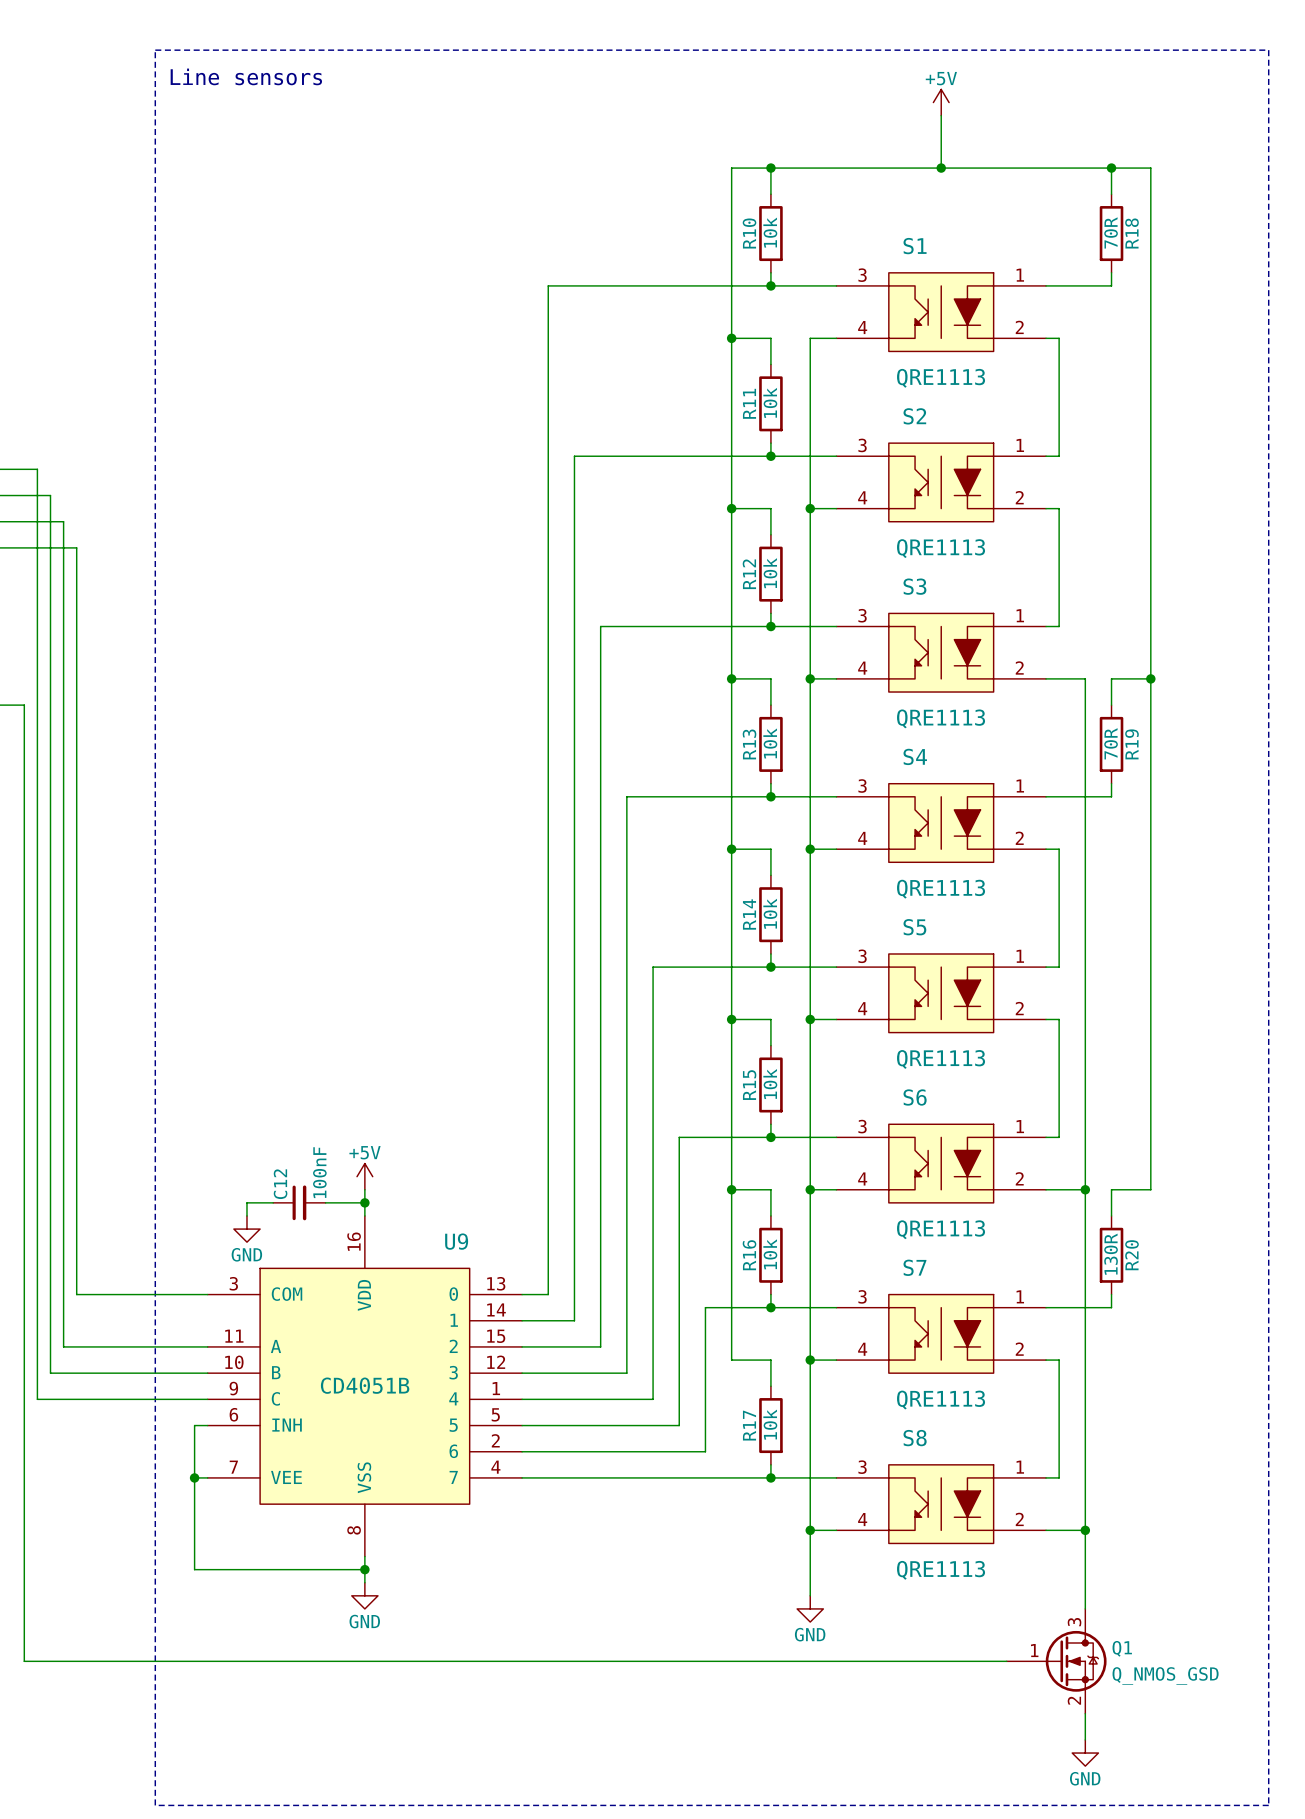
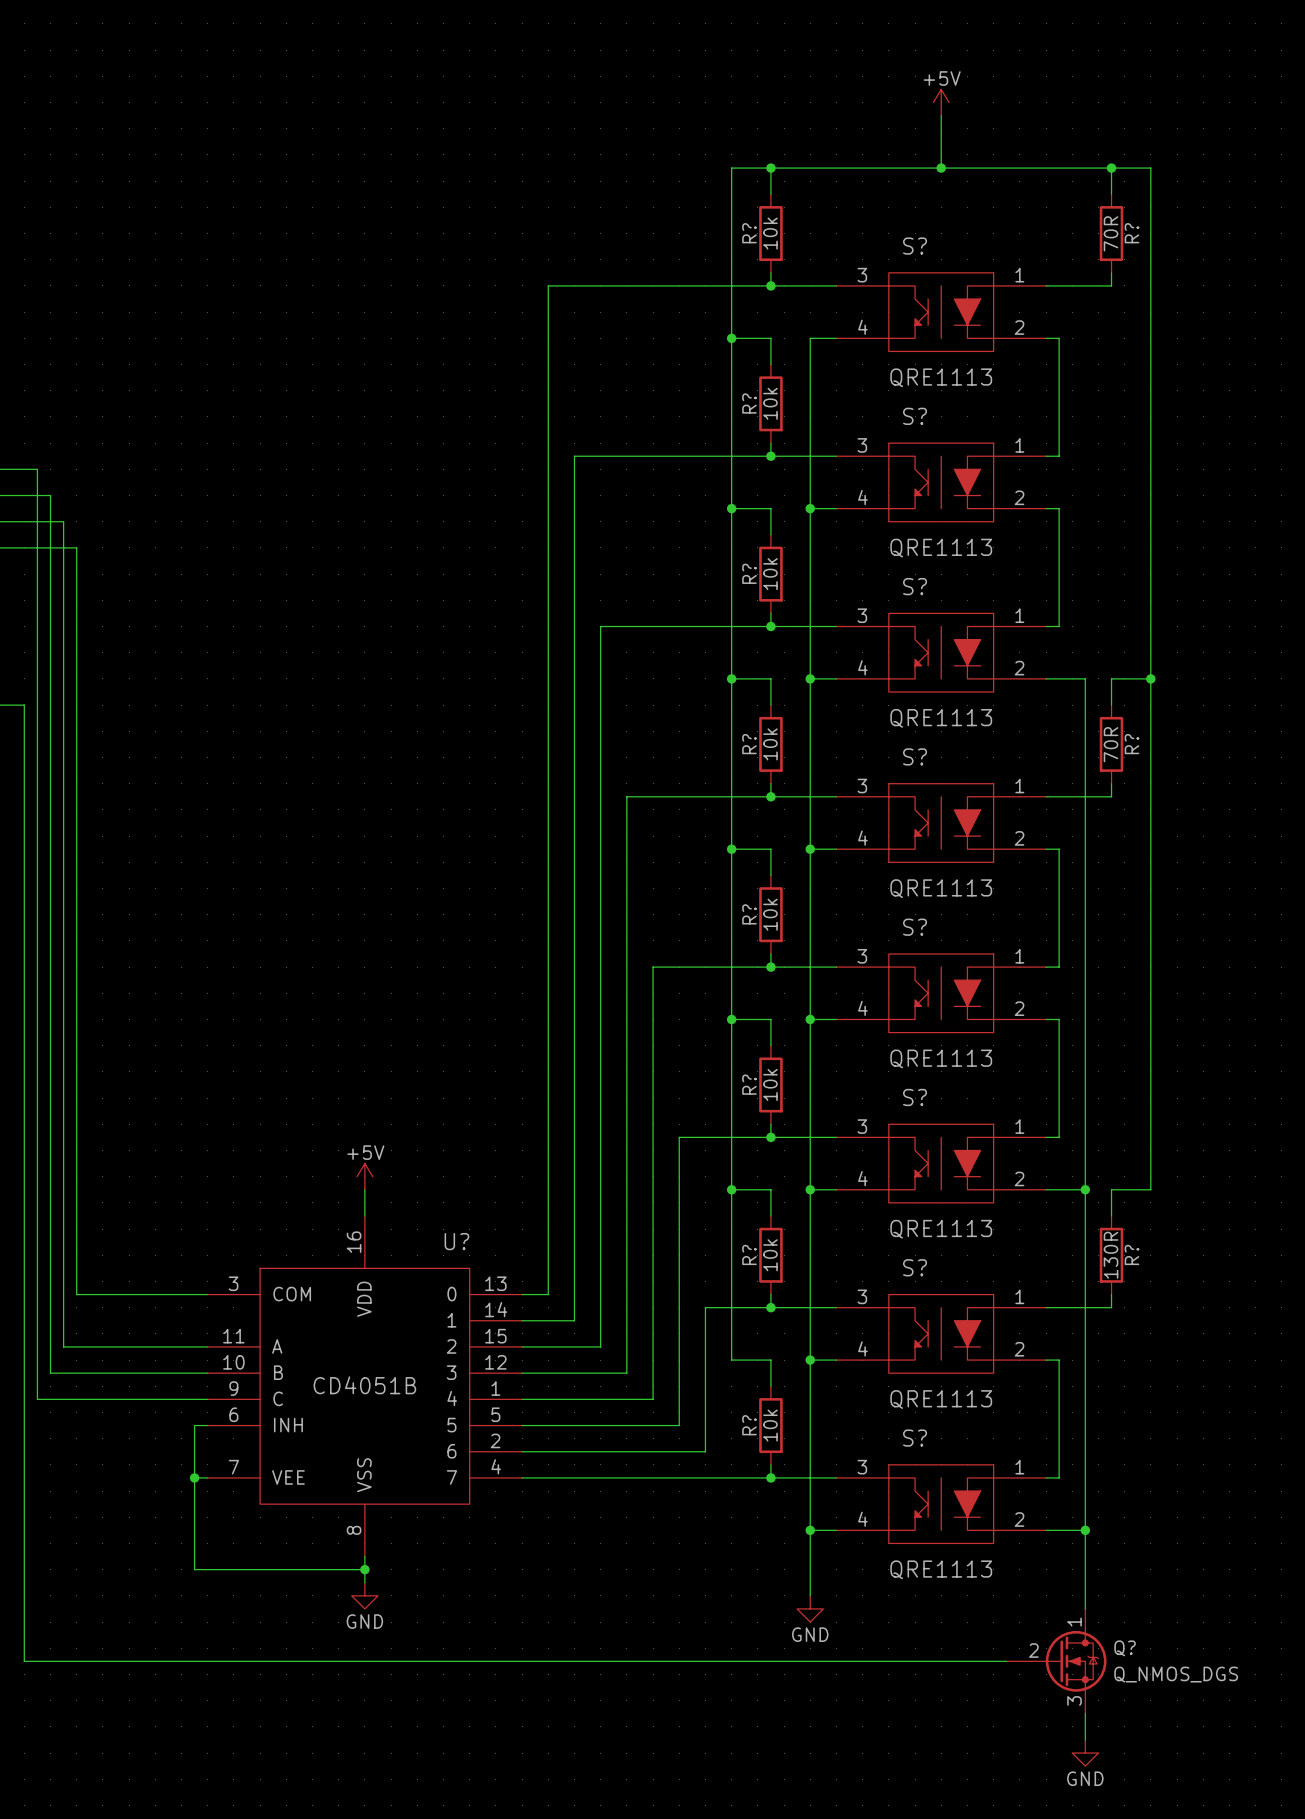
line: (155, 50) (155, 1805) (1268, 1805) (1268, 50) (155, 50) -> none
text: Line sensors (246, 76) -> none
R10 name: R10 (749, 233) -> R? (749, 233)
R18 name: R18 (1132, 233) -> R? (1131, 233)
S1 name: S1 (915, 246) -> S? (915, 246)
R11 name: R11 (749, 403) -> R? (749, 403)
S2 name: S2 (914, 416) -> S? (915, 416)
R12 name: R12 (749, 574) -> R? (749, 573)
S3 name: S3 (914, 586) -> S? (915, 586)
R13 name: R13 (749, 744) -> R? (749, 744)
R19 name: R19 (1132, 744) -> R? (1131, 744)
S4 name: S4 (915, 756) -> S? (915, 756)
R14 name: R14 (749, 914) -> R? (749, 914)
S5 name: S5 (914, 927) -> S? (915, 927)
R15 name: R15 (749, 1085) -> R? (749, 1084)
S6 name: S6 (915, 1097) -> S? (915, 1097)
wire: (273, 1202) (246, 1202) (246, 1215) -> none
C12: 100nF (299, 1202) -> none
wire: (325, 1202) (364, 1202) -> none
junction: (364, 1202) -> none
power symbol: GND (246, 1229) -> none
U9 name: U9 (456, 1241) -> U? (456, 1241)
R16 name: R16 (749, 1255) -> R? (749, 1254)
R20 name: R20 (1132, 1255) -> R? (1131, 1254)
S7 name: S7 (914, 1267) -> S? (915, 1267)
R17 name: R17 (749, 1425) -> R? (749, 1425)
S8 name: S8 (915, 1438) -> S? (915, 1438)
Q1 pin number: 3 (1074, 1622) -> 1 (1074, 1622)
Q1 name: Q1 (1122, 1648) -> Q? (1125, 1648)
Q1 pin number: 1 (1034, 1650) -> 2 (1033, 1650)
Q1 value: Q_NMOS_GSD (1165, 1675) -> Q_NMOS_DGS (1176, 1674)
Q1 pin number: 2 (1074, 1700) -> 3 (1074, 1700)

